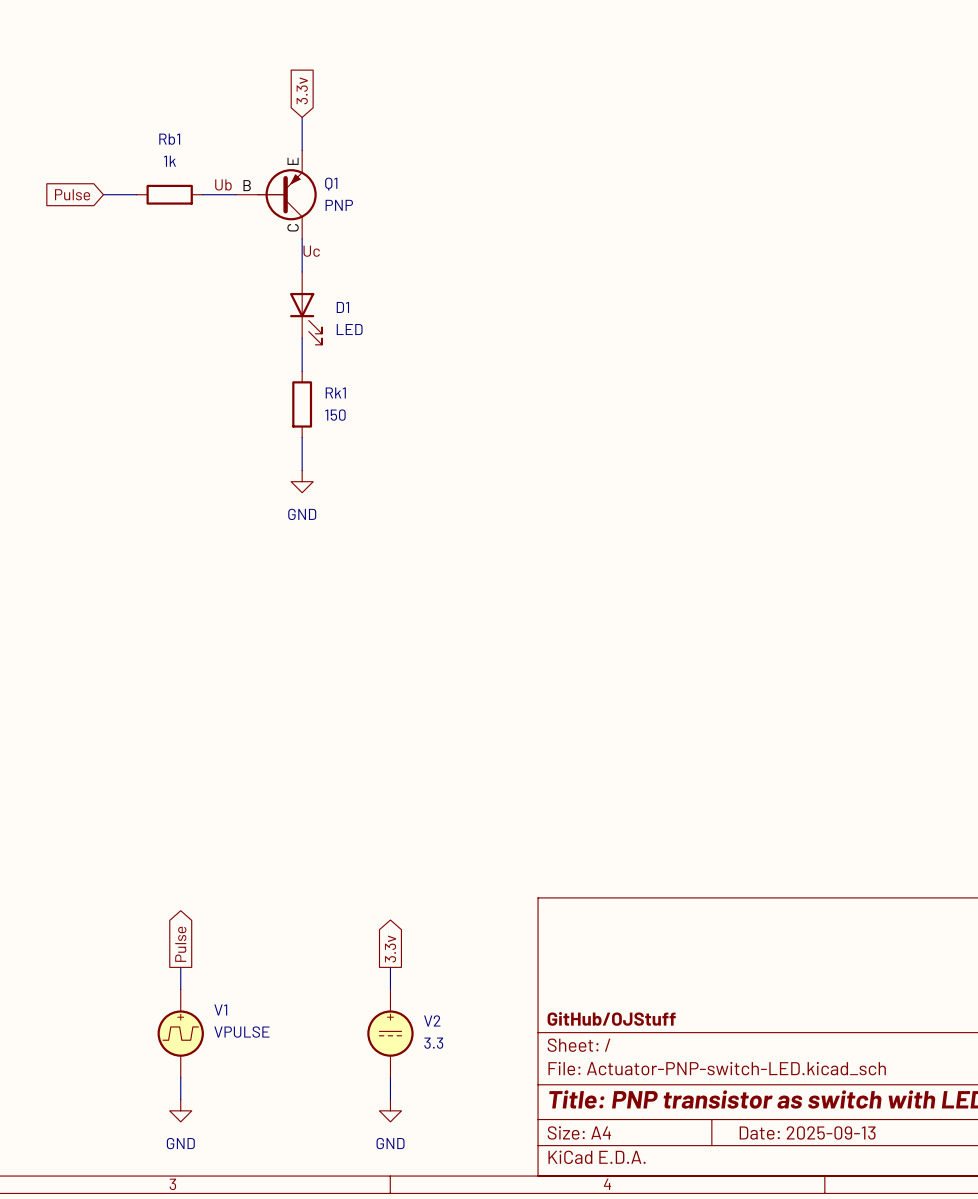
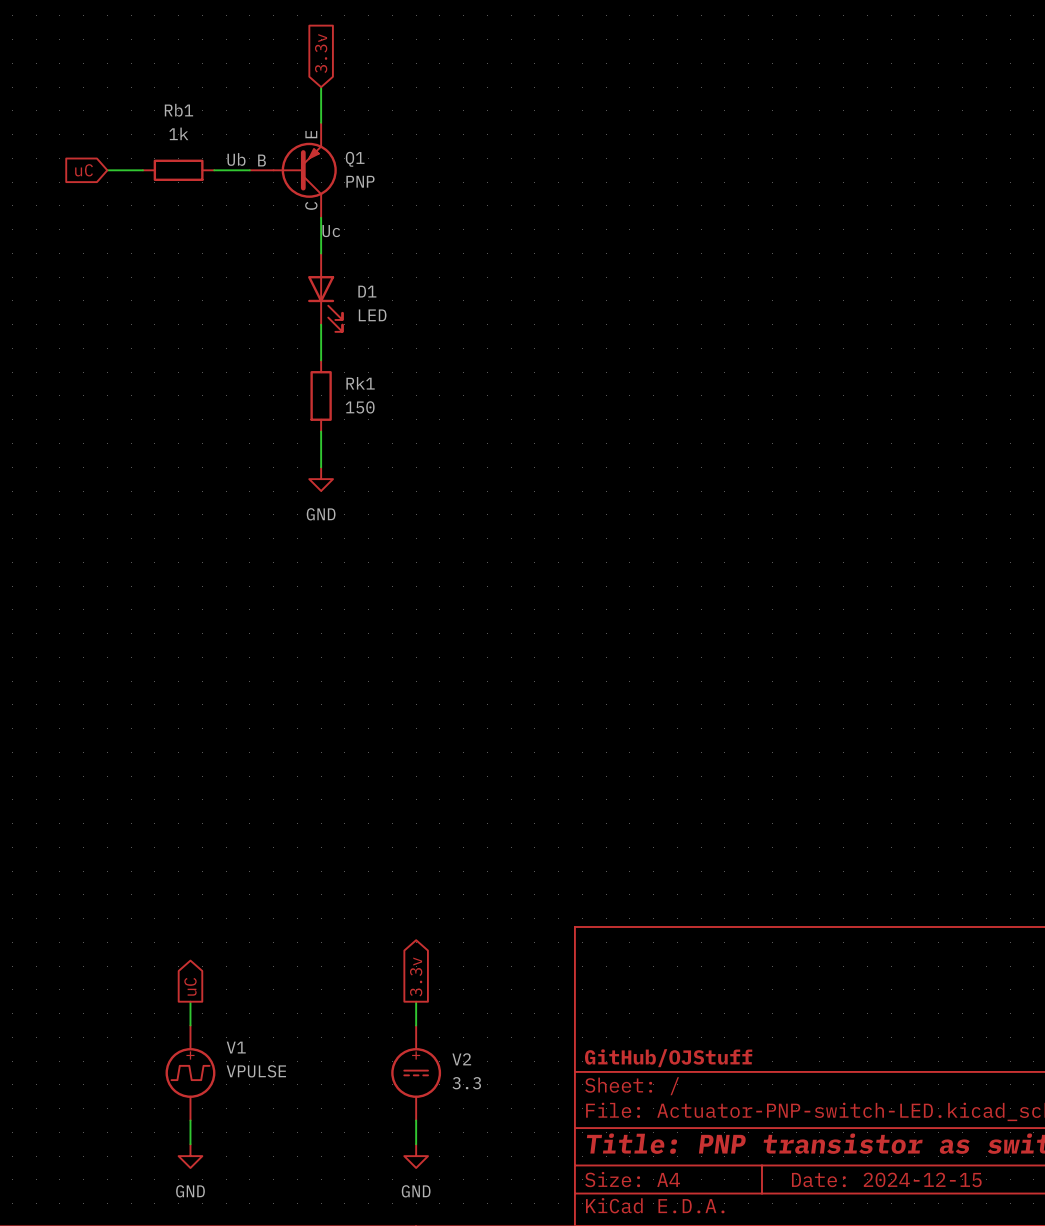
global label: Pulse (72, 194) -> uC (84, 170)
global label: Pulse (180, 944) -> uC (190, 986)
title block: Date: 2025-09-13 (807, 1132) -> Date: 2024-12-15 (886, 1179)

